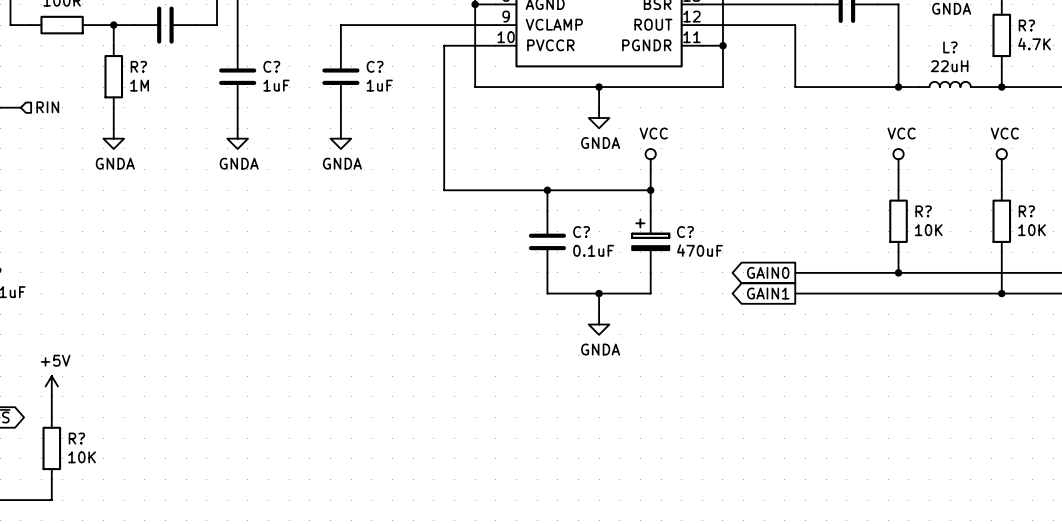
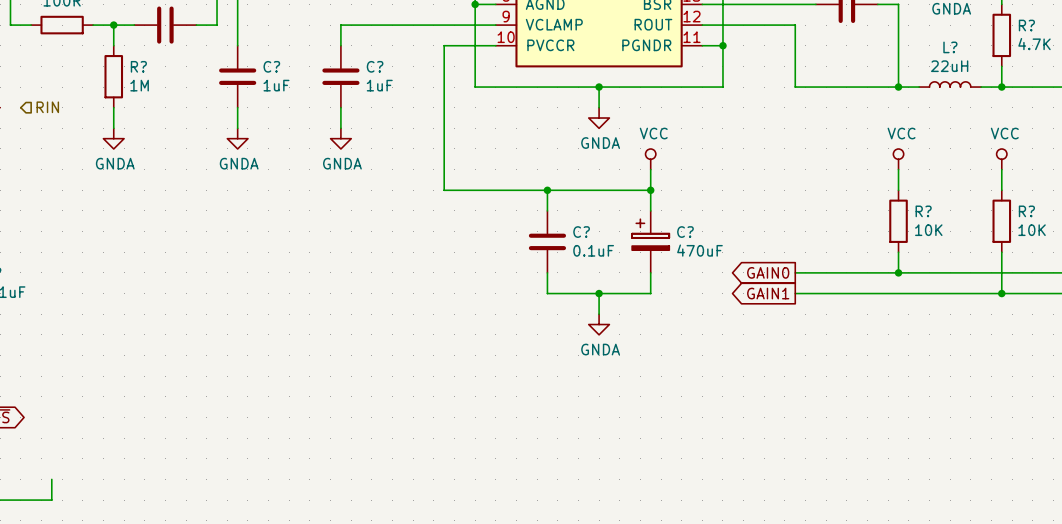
wire: (0, 107) (20, 107) -> none
power symbol: +5V (51, 386) -> none
wire: (51, 396) (51, 417) -> none
R?: 10K (51, 448) -> none

